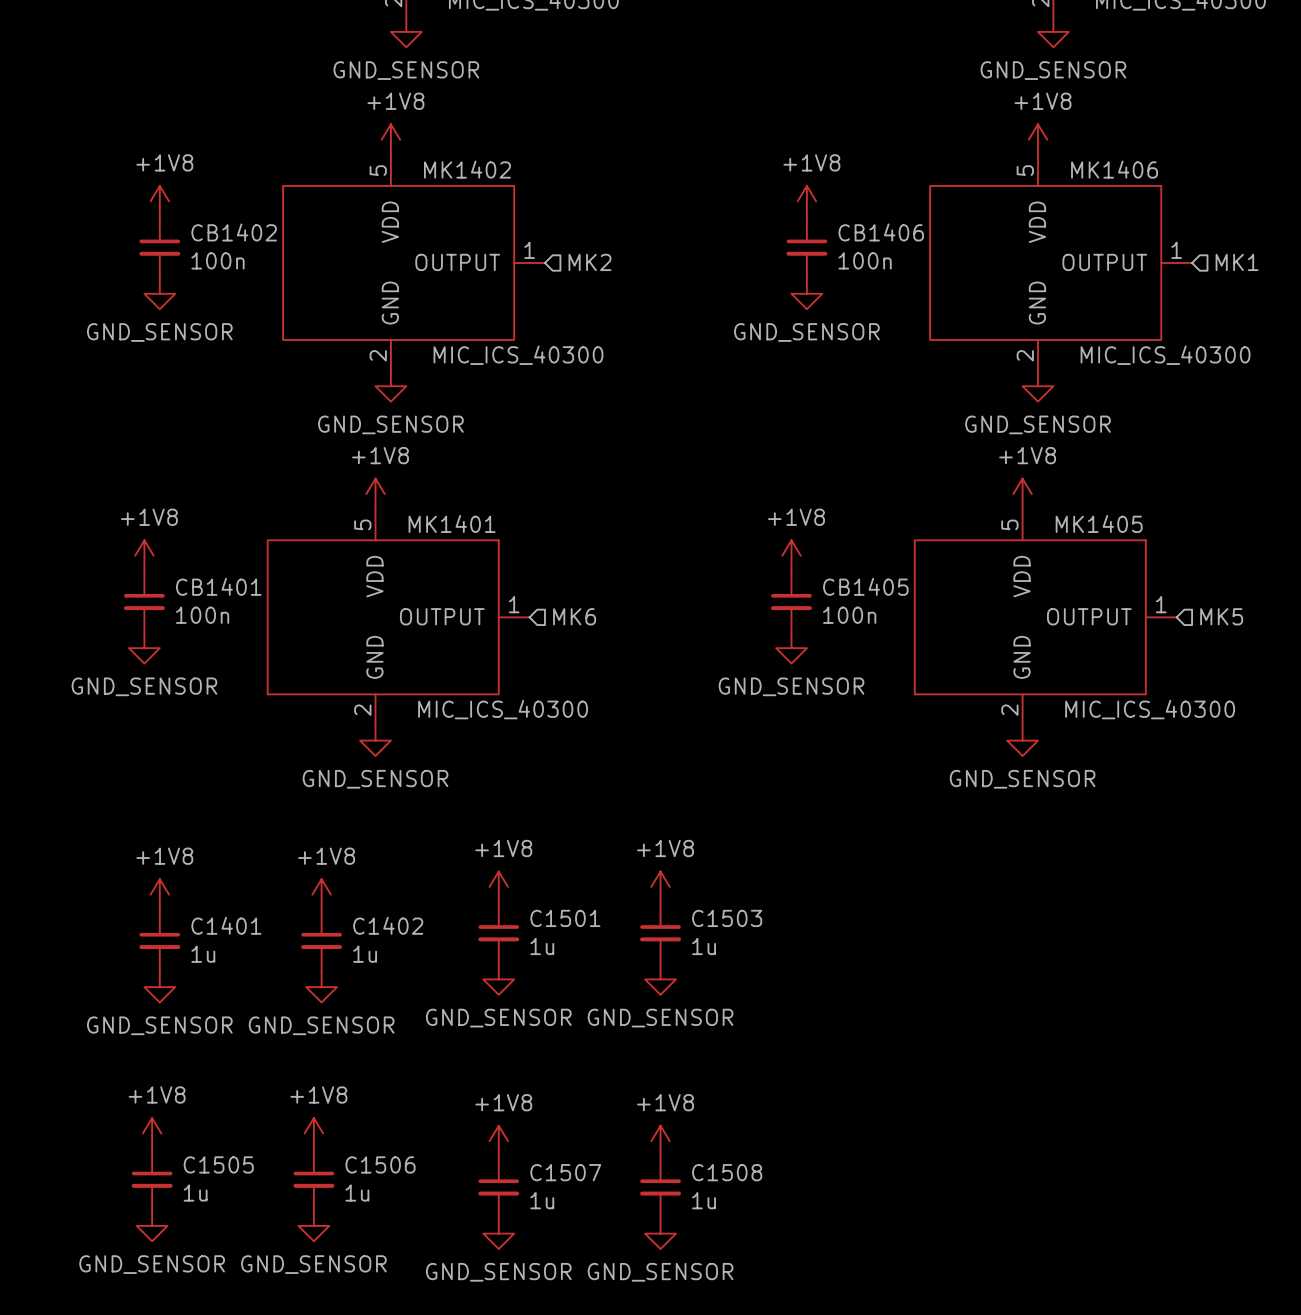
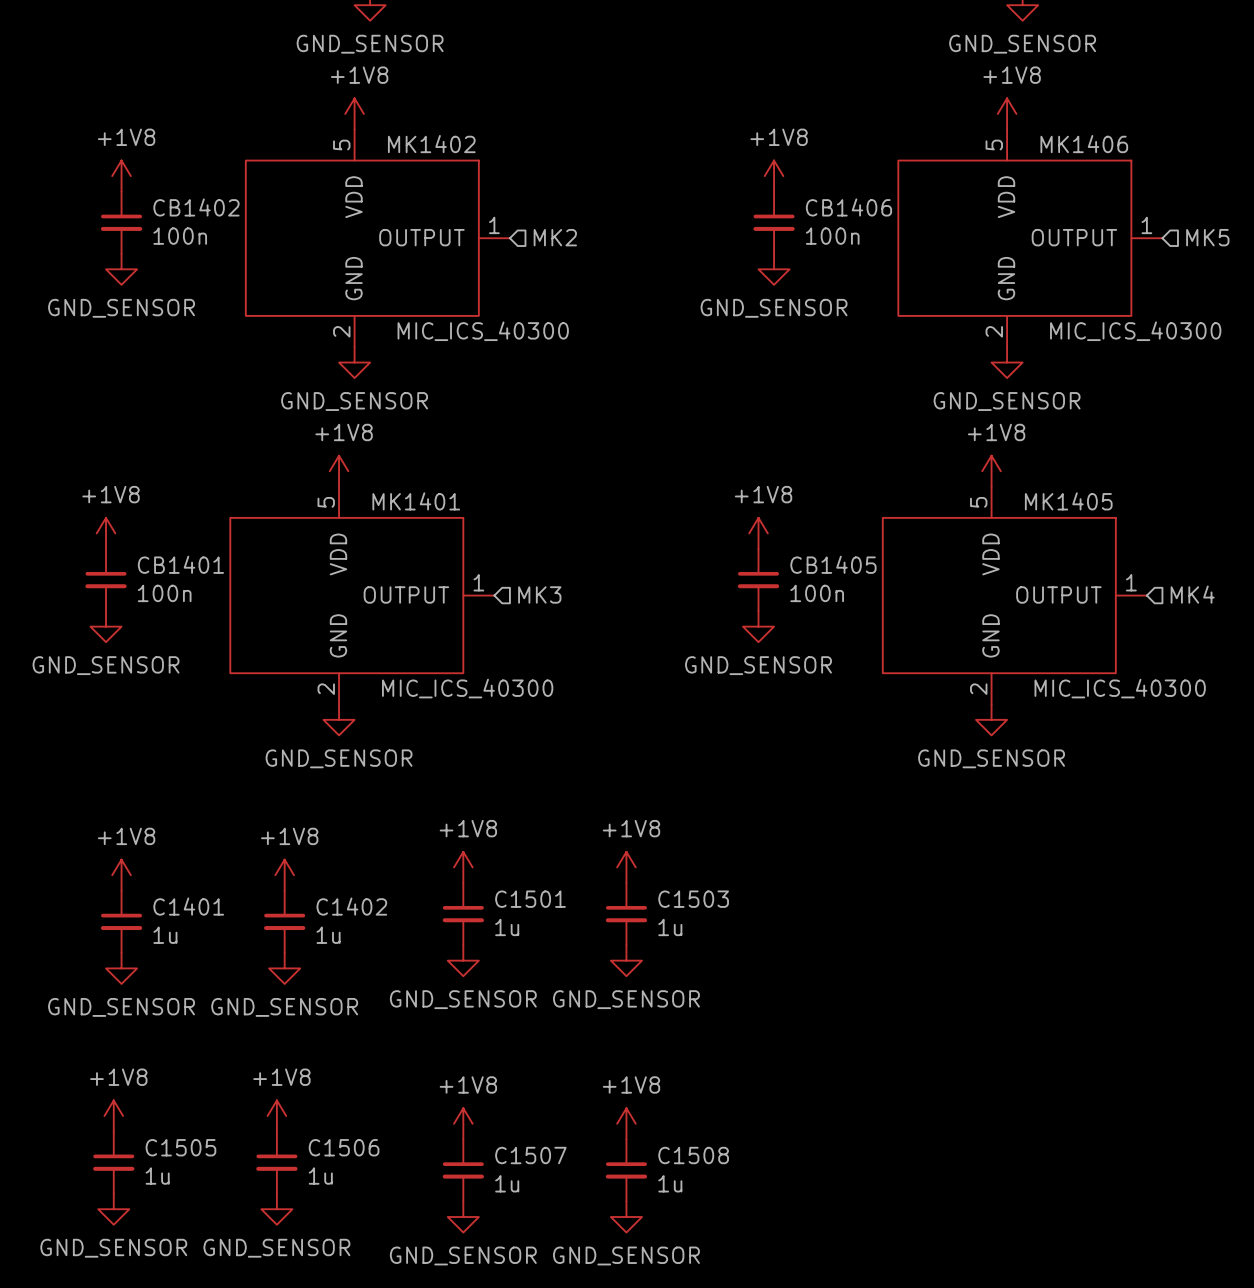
hierarchical label: MK1 (1237, 262) -> MK5 (1207, 237)
hierarchical label: MK6 (574, 616) -> MK3 (539, 594)
hierarchical label: MK5 (1221, 616) -> MK4 (1192, 594)

